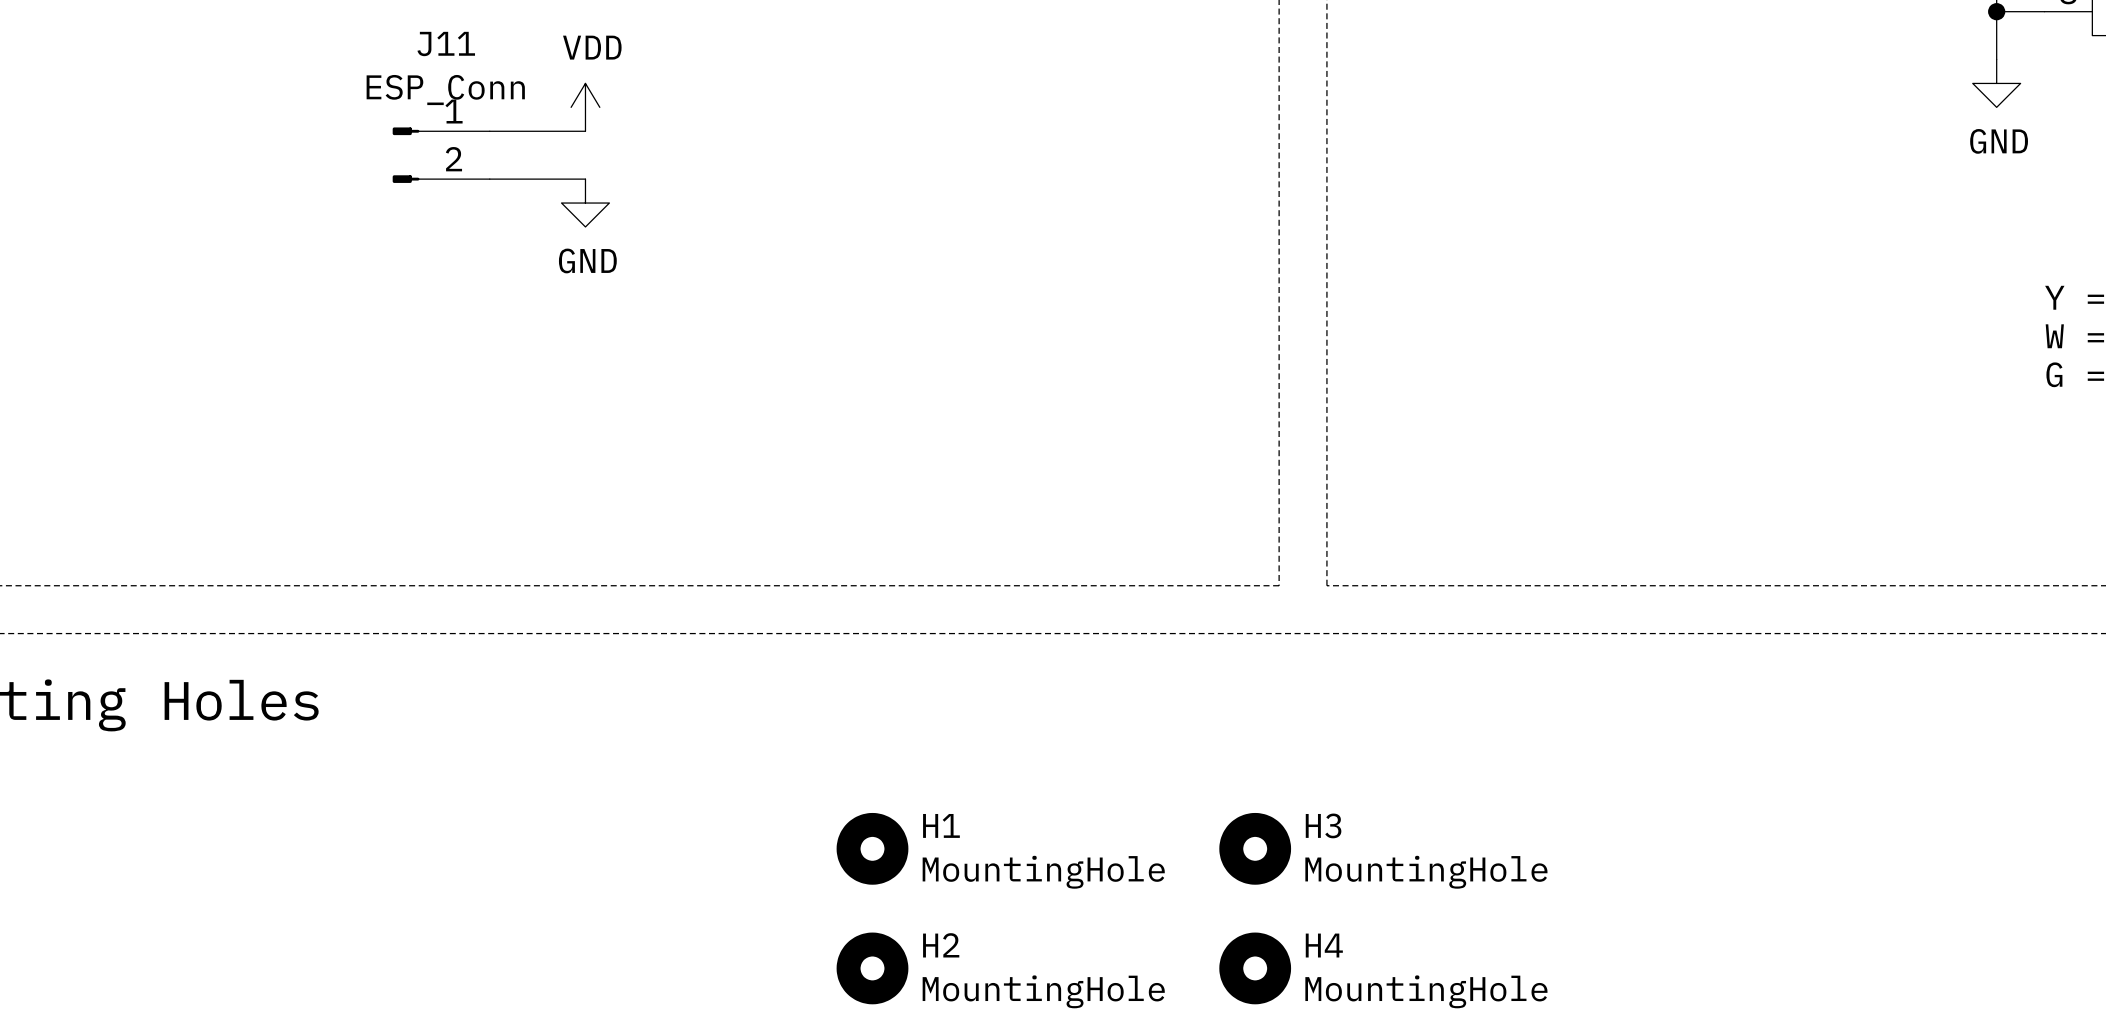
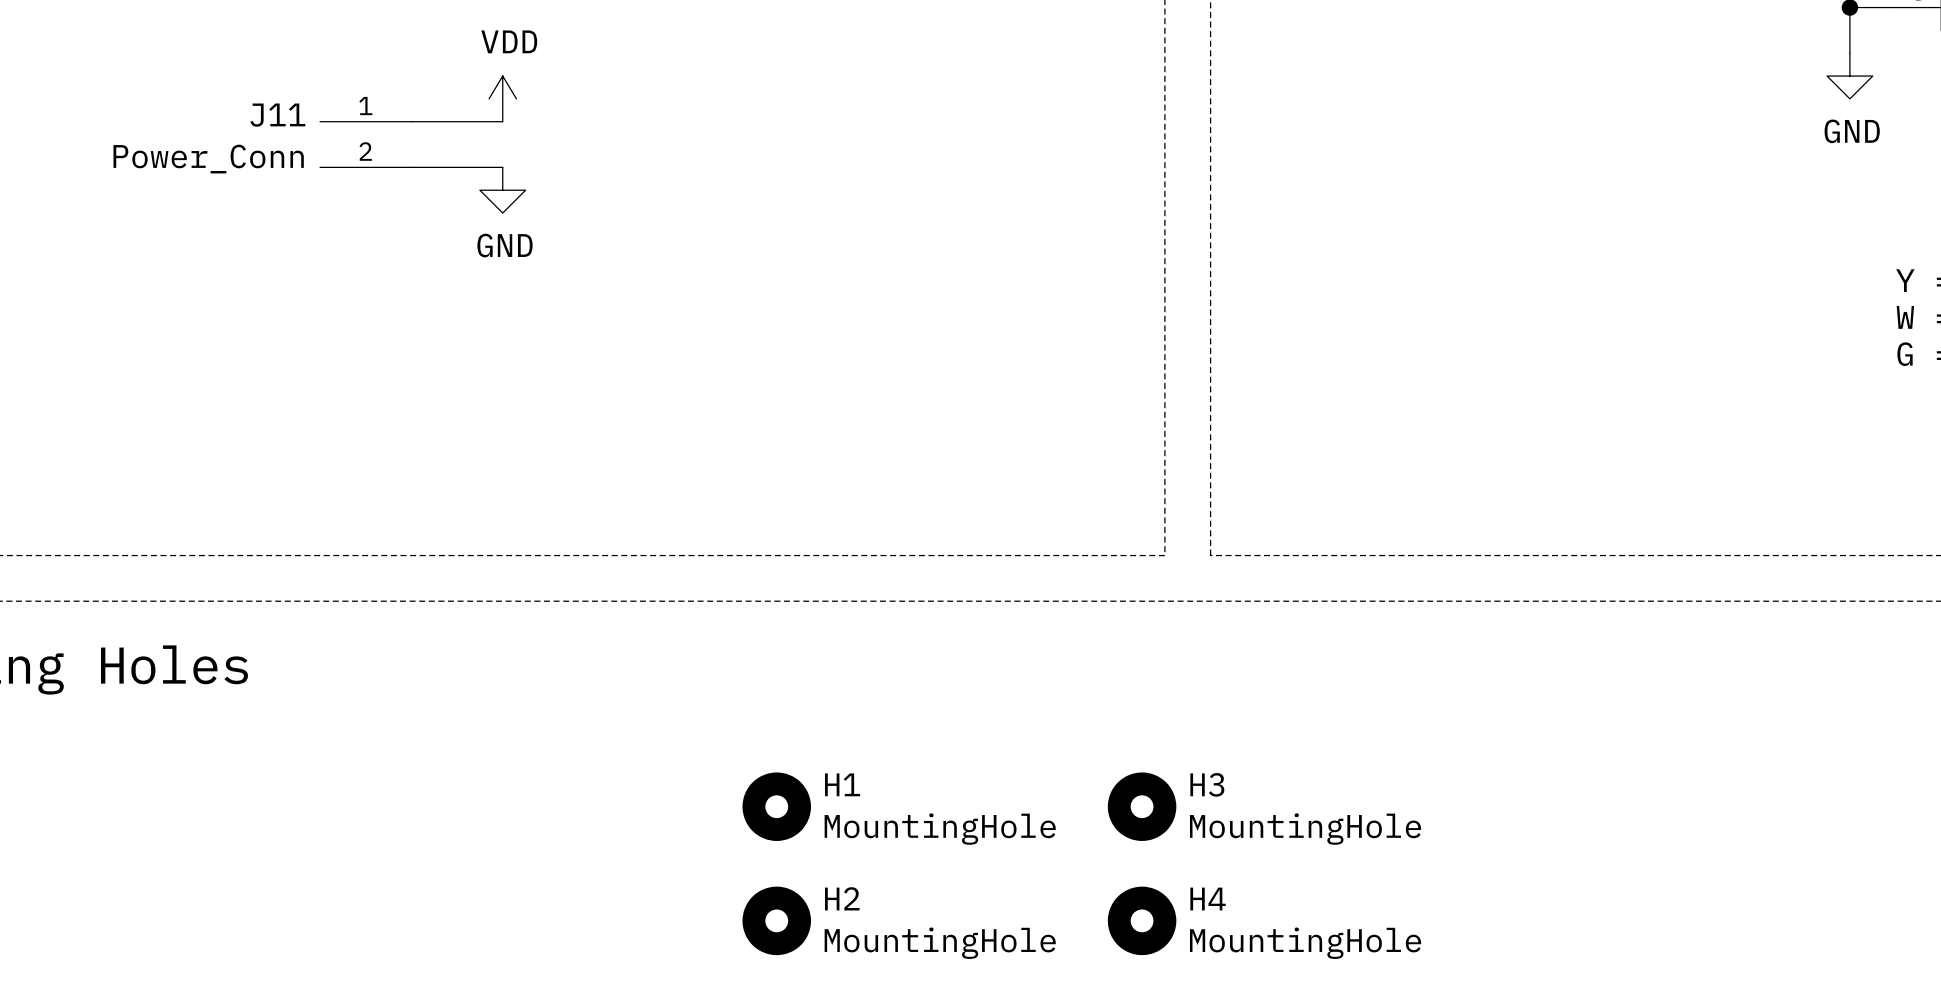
J11 name position: J11 (446, 44) -> J11 (277, 115)
J11 value: ESP_Conn (445, 90) -> Power_Conn (208, 159)
J11 symbol: [392, 127, 490, 183] -> [320, 121, 412, 168]

